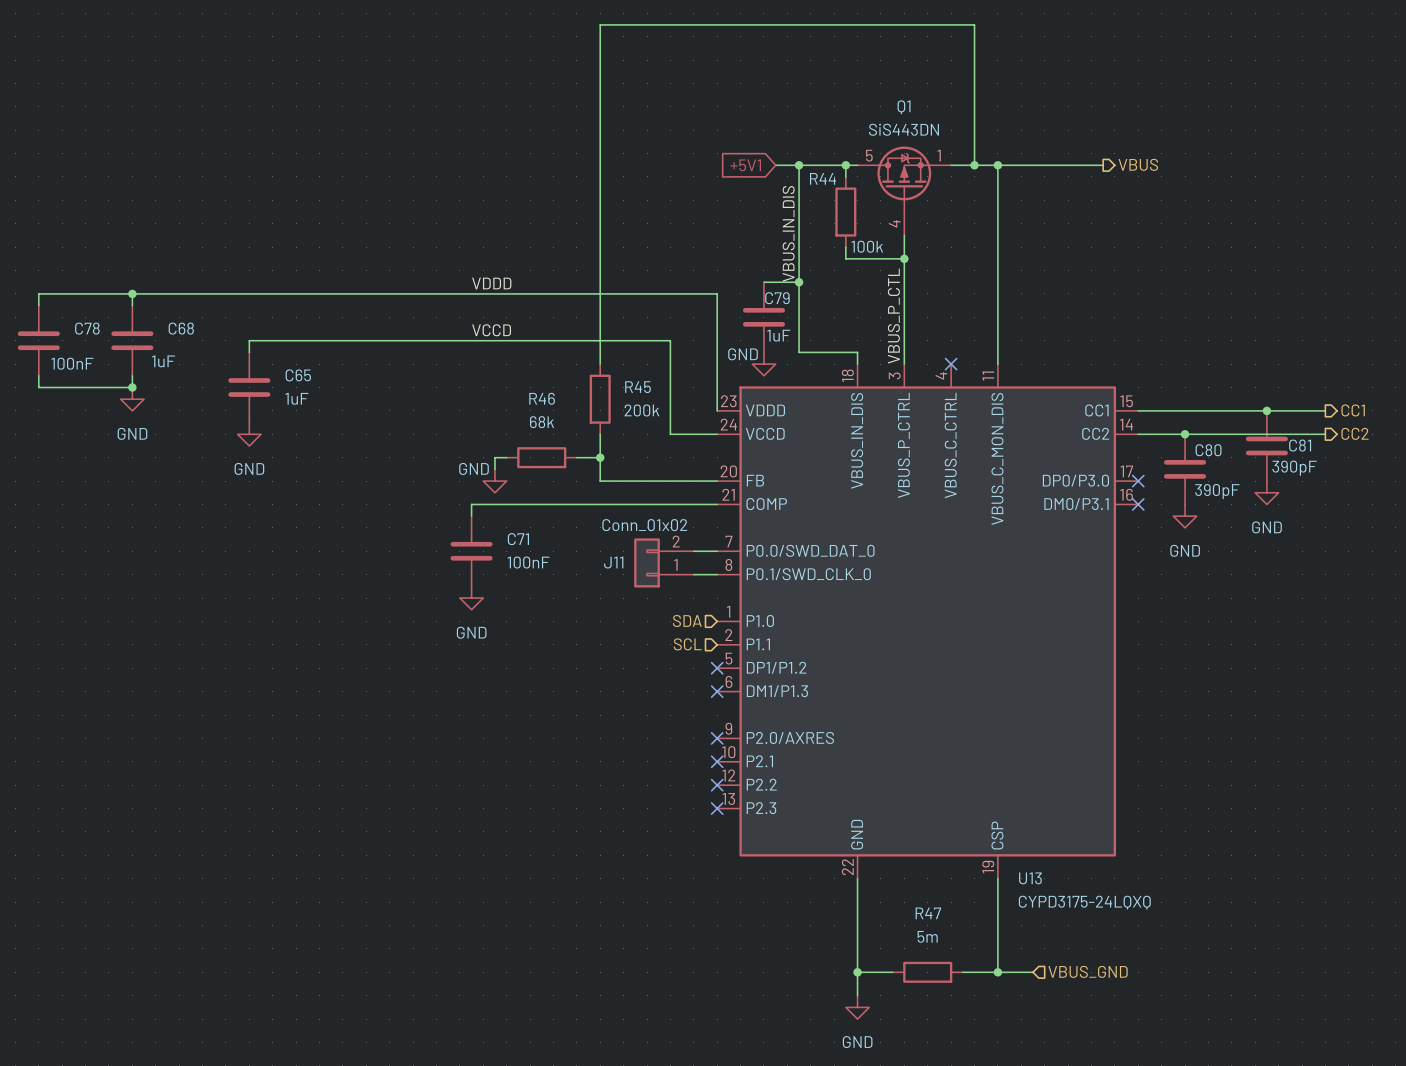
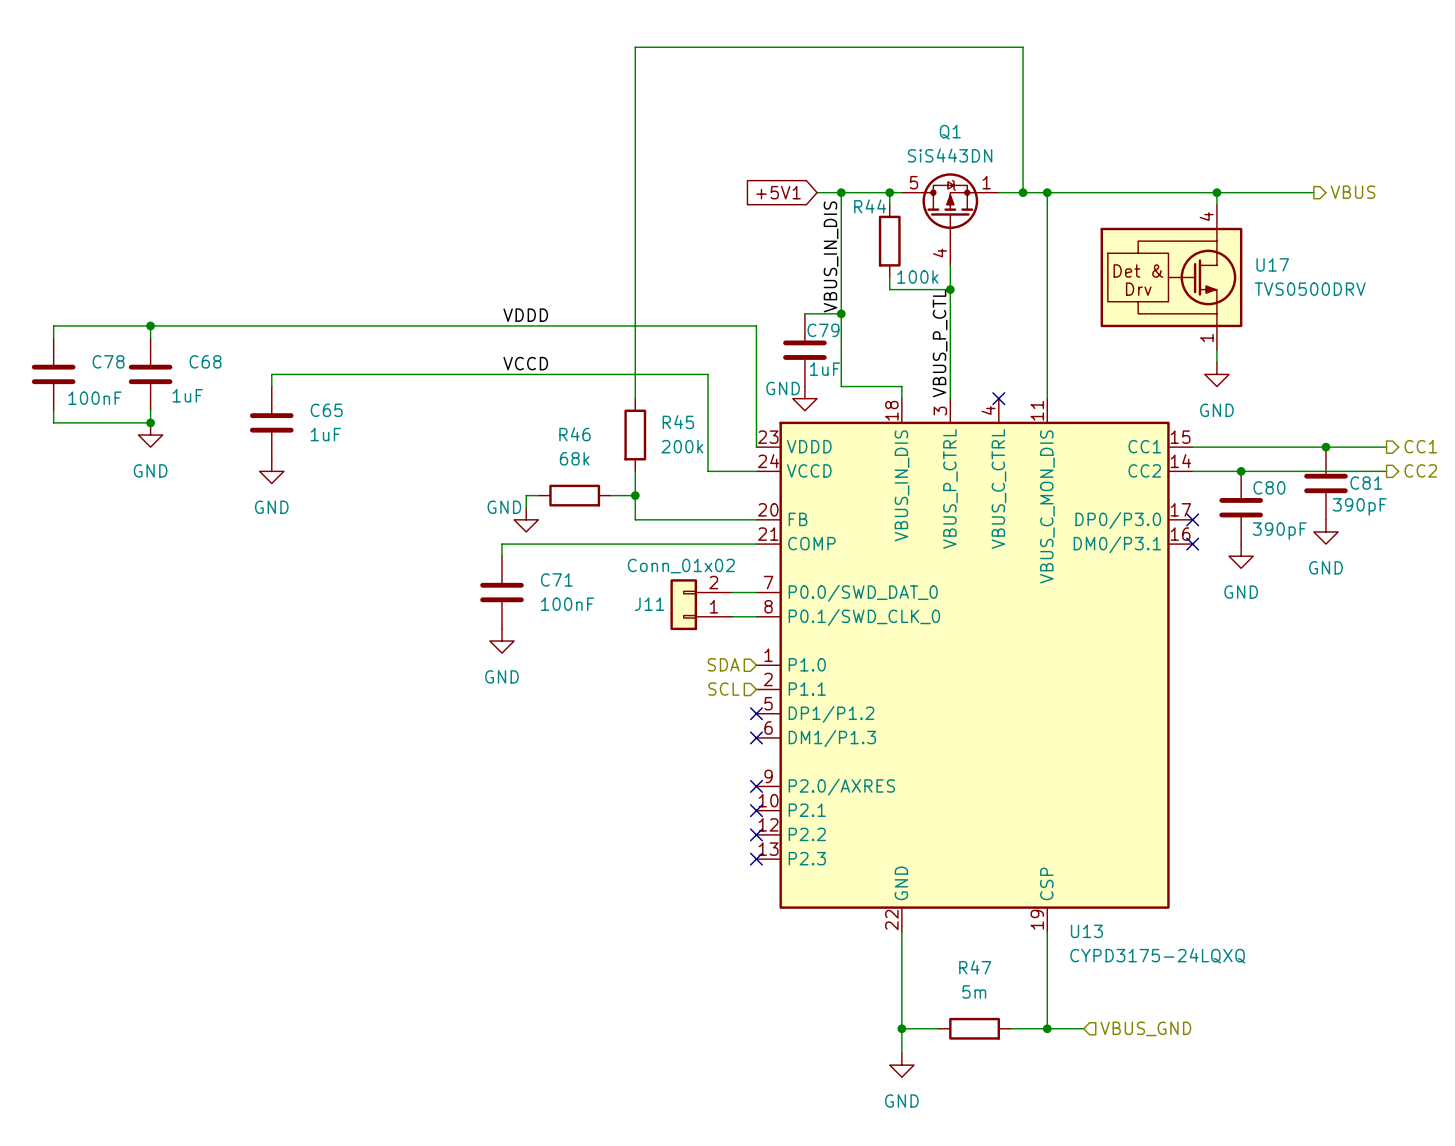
hierarchical label position: VBUS (1138, 164) -> VBUS (1353, 192)
wire: none -> (1156, 192) (1313, 192)
wire: none -> (1216, 192) (1216, 204)
junction: none -> (1216, 192)
U17: none -> TVS0500DRV (1171, 277)
wire: none -> (1216, 350) (1216, 362)
power symbol: none -> GND (1216, 374)

